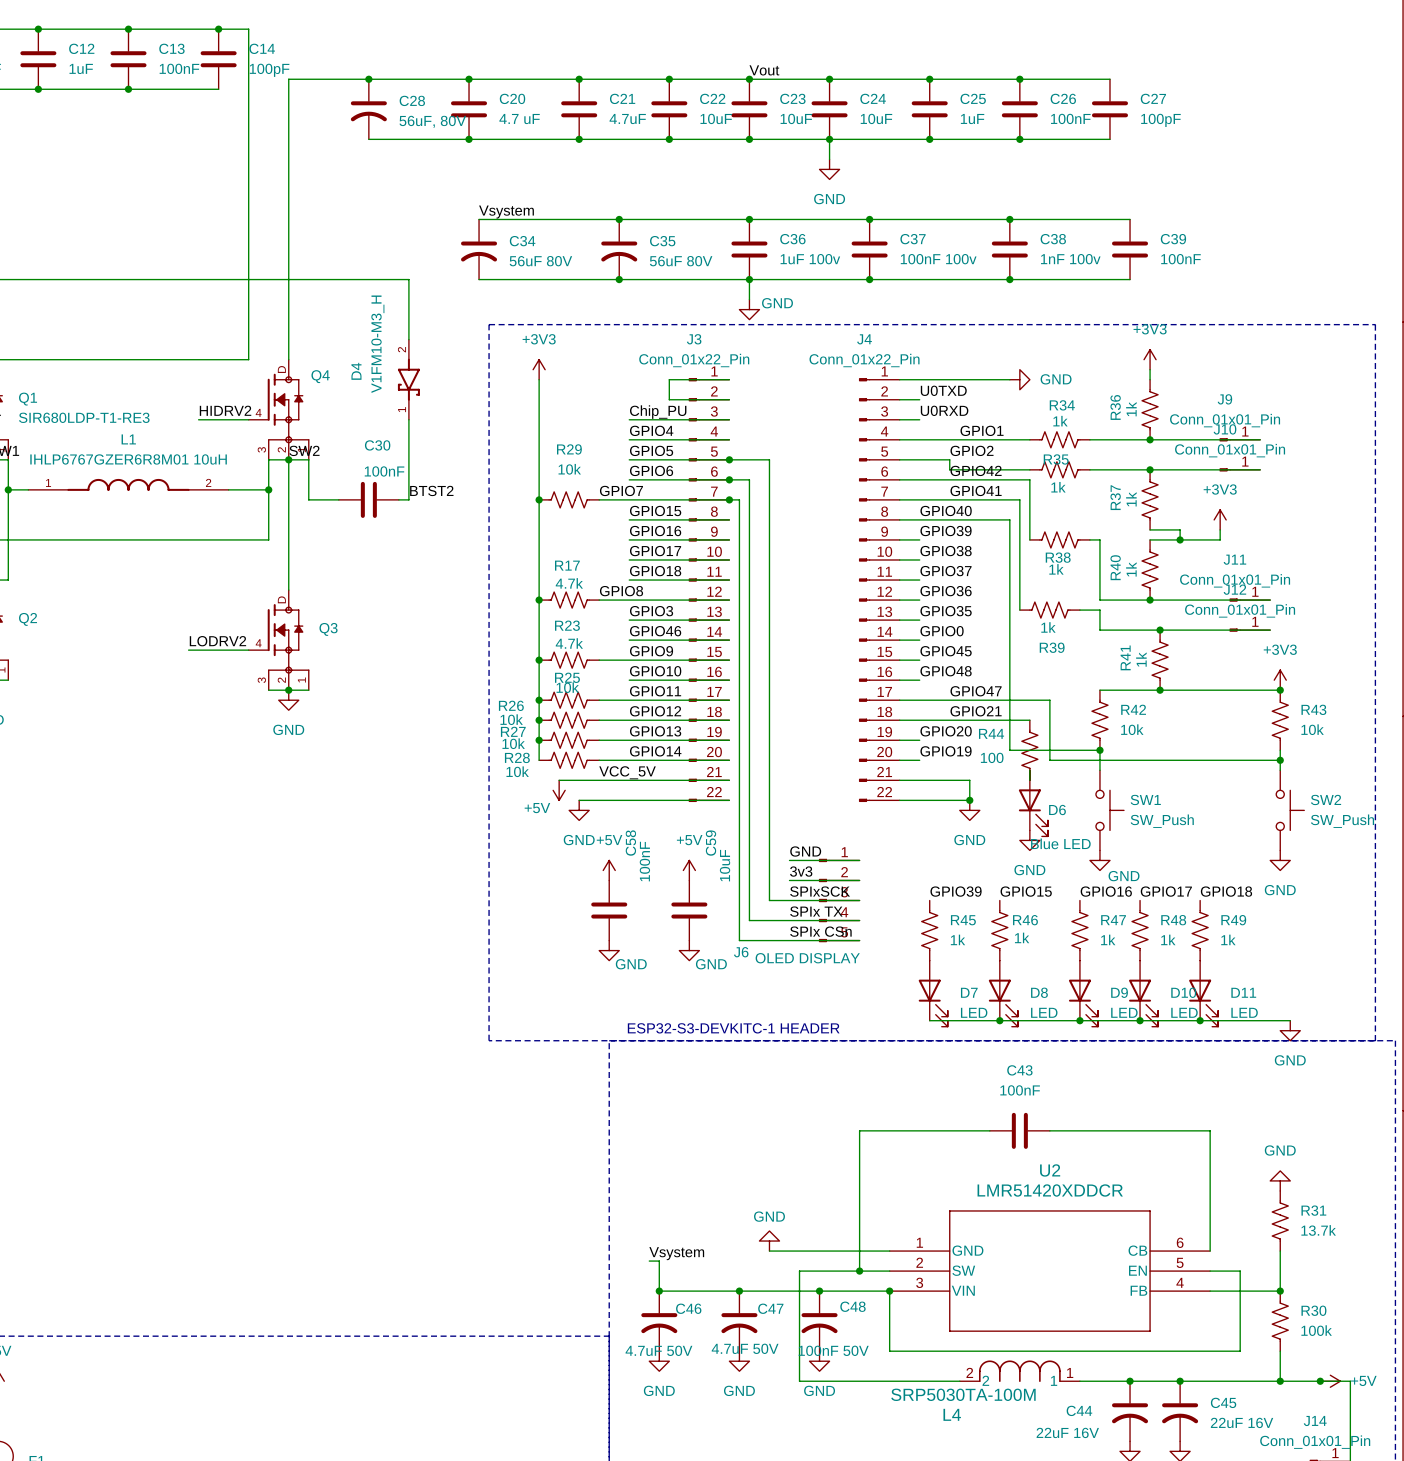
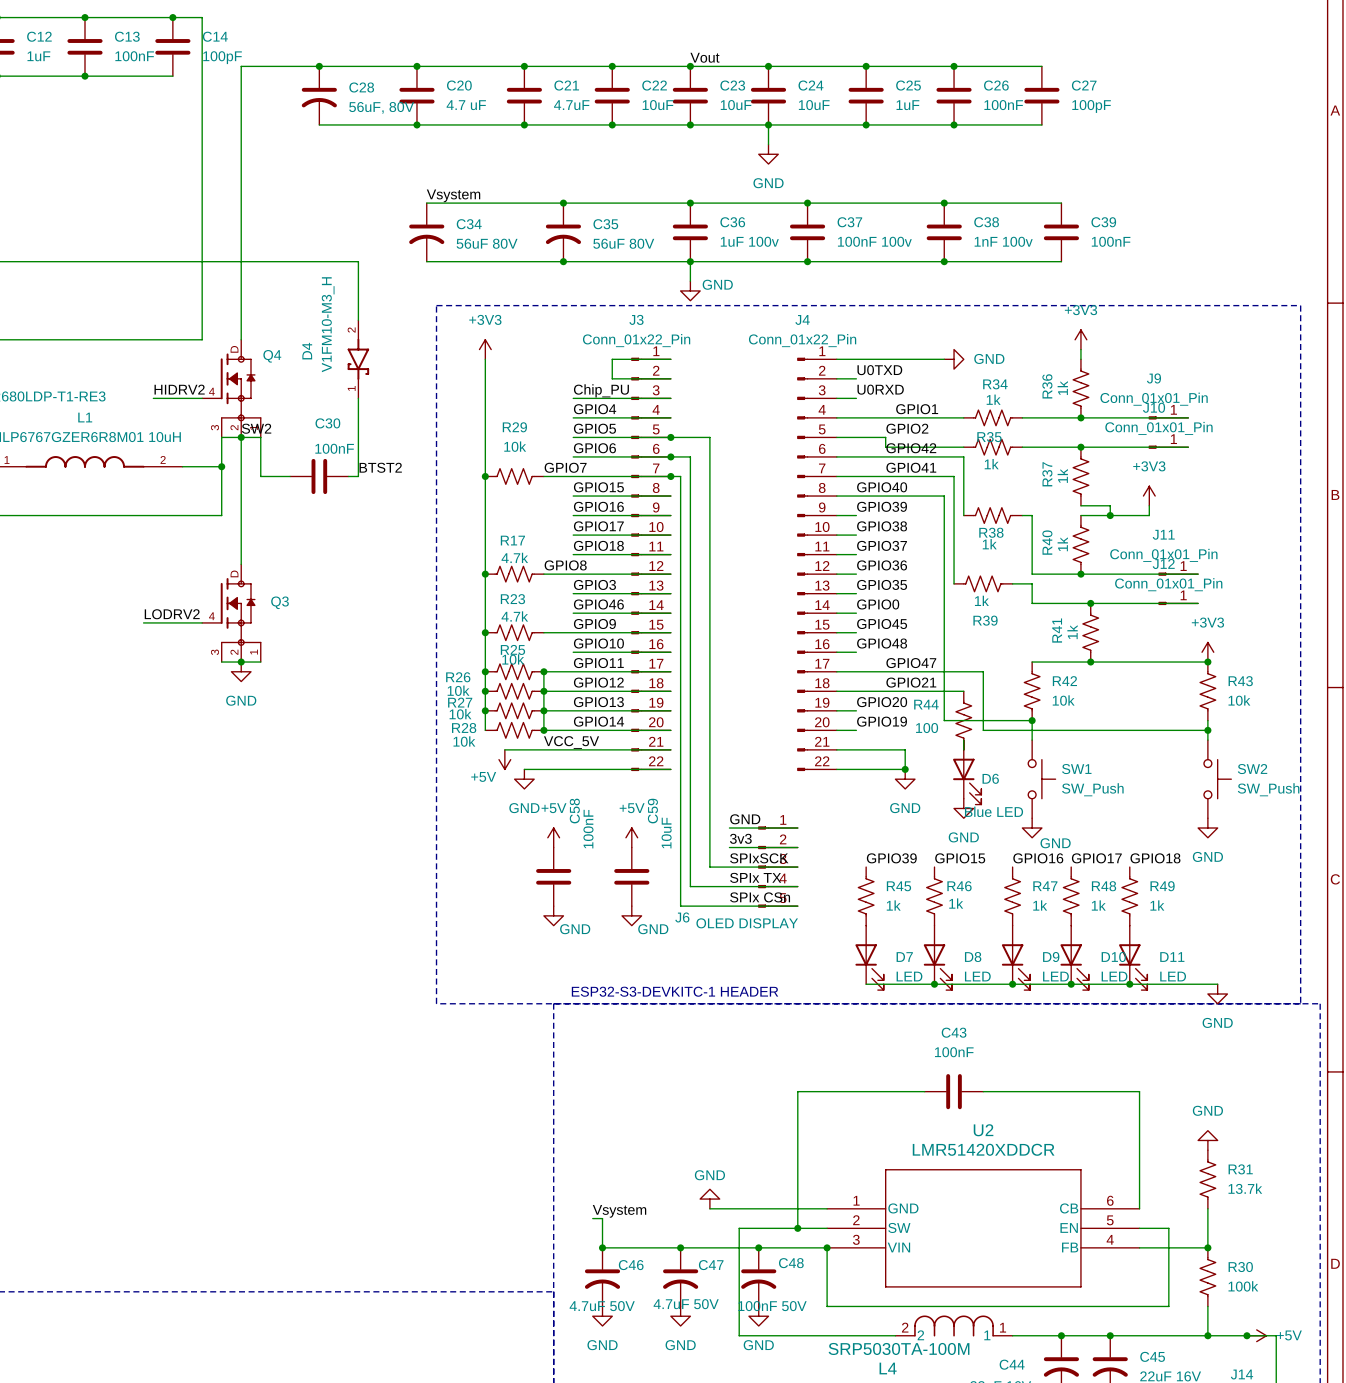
wire: none -> (543, 671) (543, 730)
junction: none -> (543, 671)
junction: none -> (543, 691)
junction: none -> (543, 710)
junction: none -> (543, 730)

